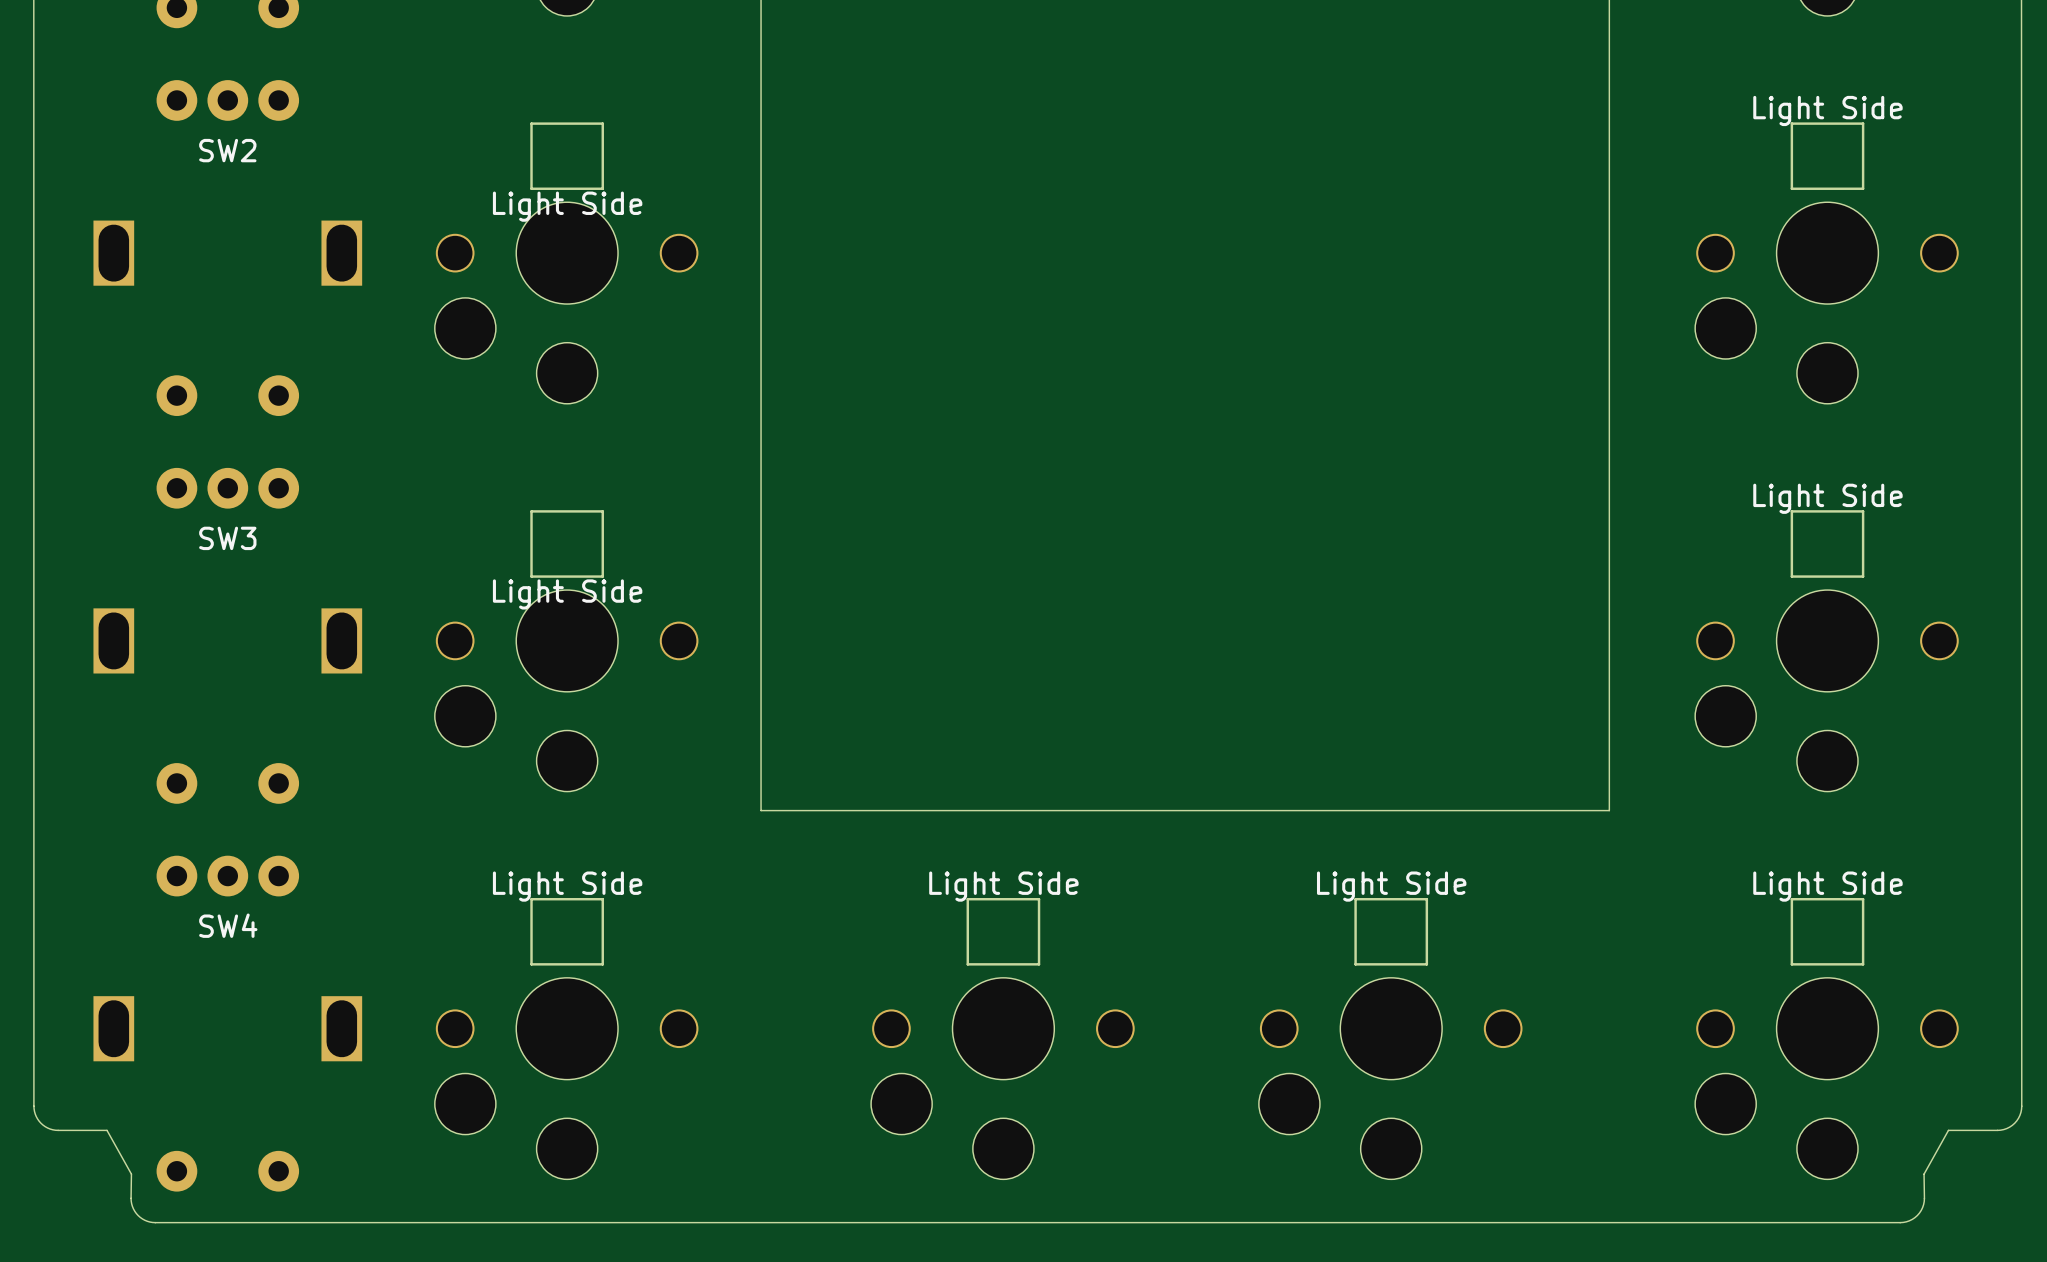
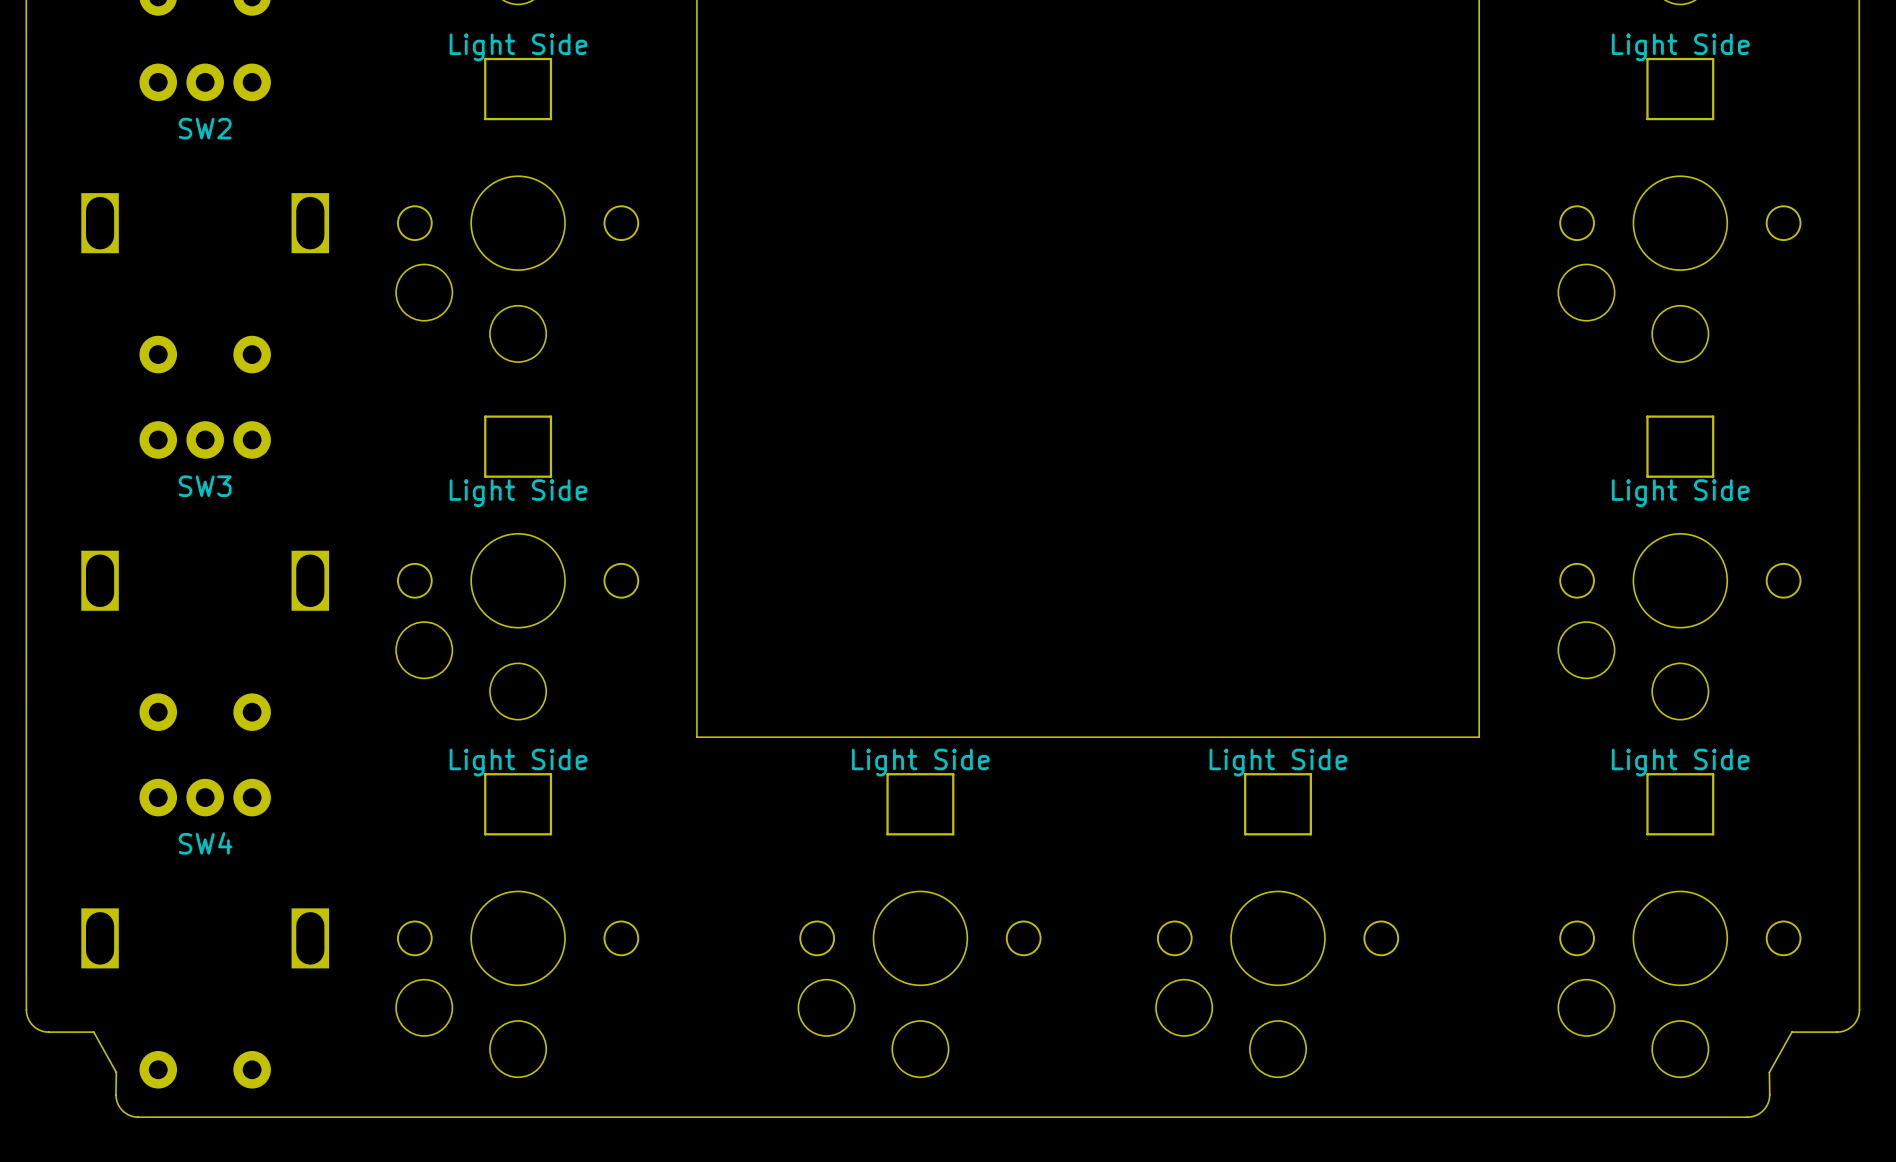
part rotation: 0° (567, 156) -> 180° (518, 89)
part position: (567, 156) -> (518, 89)
part position: (1827, 156) -> (1680, 89)
part position: (567, 543) -> (518, 446)
part rotation: 0° (1827, 543) -> 180° (1680, 446)
part position: (1827, 543) -> (1680, 446)
part position: (567, 931) -> (518, 804)
part position: (1003, 931) -> (920, 804)
part position: (1391, 931) -> (1278, 804)
part position: (1827, 931) -> (1680, 804)

